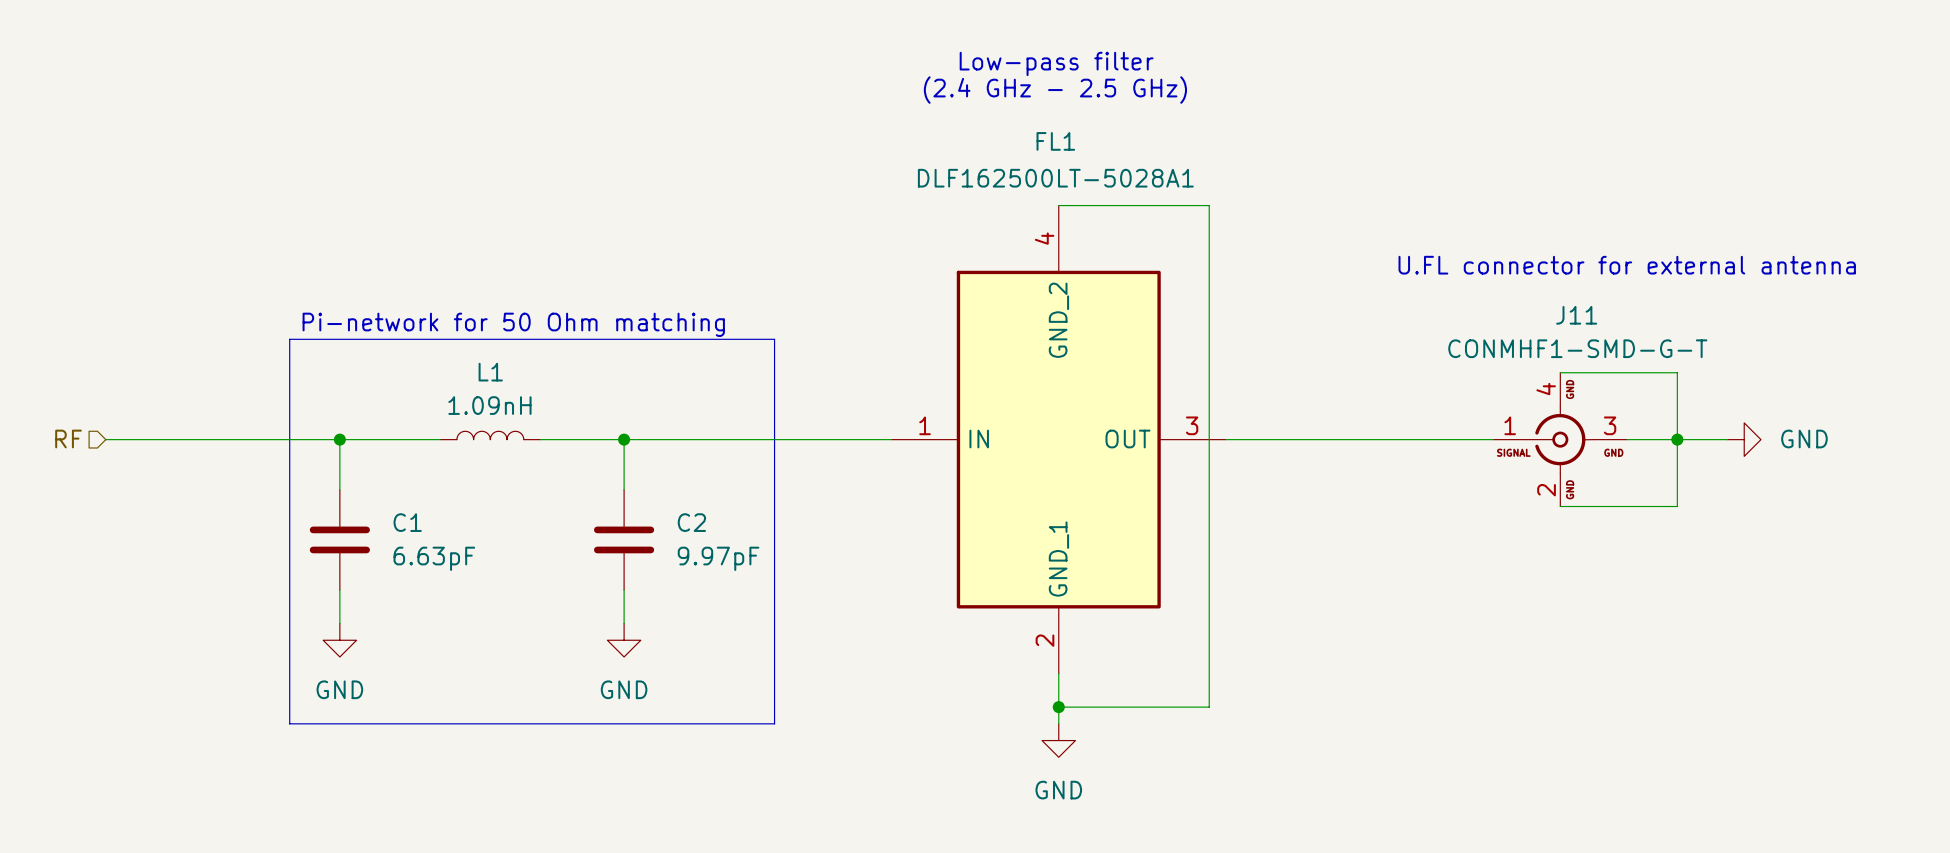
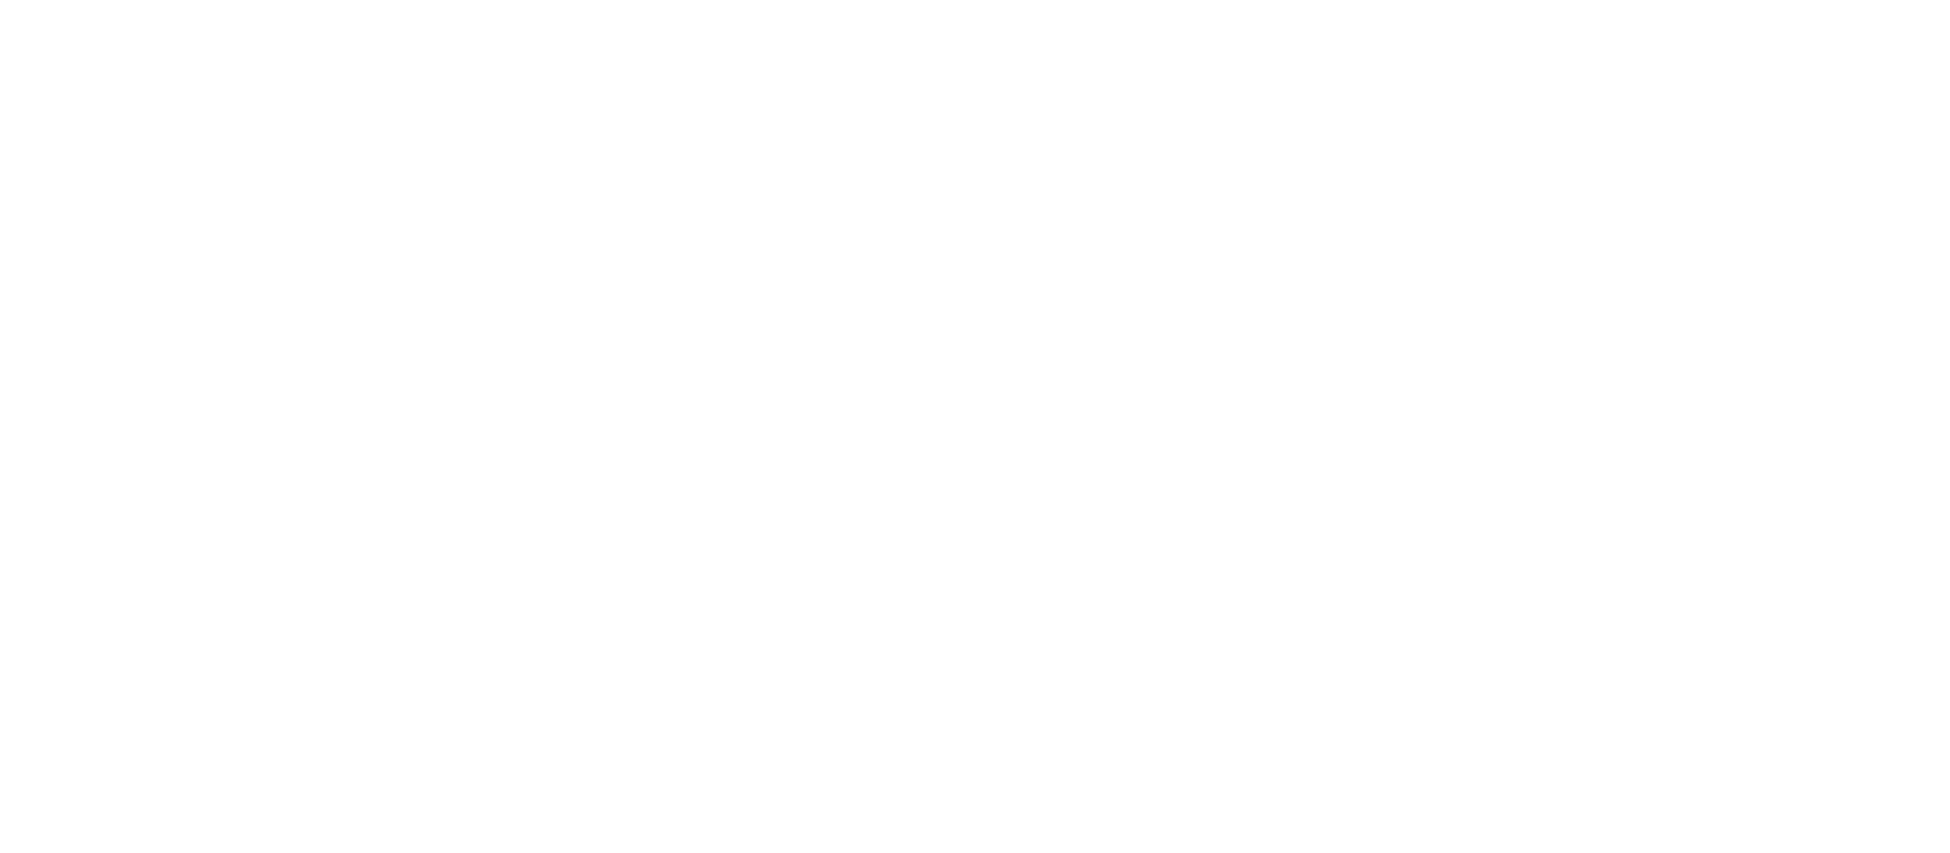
text: Low-pass filter (1056, 63) -> none
text: (2.4 GHz - 2.5 GHz) (1055, 90) -> none
wire: (1058, 205) (1209, 205) (1209, 707) (1058, 707) -> none
text: U.FL connector for external antenna (1627, 265) -> none
text: Pi-network for 50 Ohm matching (513, 324) -> none
line: (289, 339) (774, 339) (774, 723) (289, 723) (289, 339) -> none
wire: (1560, 372) (1677, 372) (1677, 506) (1560, 506) -> none
L1: 1.09nH (490, 435) -> none
hierarchical label: RF (68, 439) -> none
wire: (105, 439) (440, 439) -> none
wire: (339, 439) (339, 489) -> none
junction: (339, 439) -> none
wire: (540, 439) (891, 439) -> none
wire: (624, 439) (624, 489) -> none
junction: (624, 439) -> none
FL1: DLF162500LT-5028A1 (1058, 439) -> none
wire: (1225, 439) (1493, 439) -> none
J11: CONMHF1-SMD-G-T (1560, 439) -> none
wire: (1627, 439) (1727, 439) -> none
junction: (1677, 439) -> none
power symbol: GND (1744, 439) -> none
C1: 6.63pF (339, 539) -> none
C2: 9.97pF (624, 539) -> none
wire: (339, 590) (339, 623) -> none
wire: (624, 590) (624, 623) -> none
power symbol: GND (339, 640) -> none
power symbol: GND (624, 640) -> none
wire: (1058, 673) (1058, 723) -> none
junction: (1058, 707) -> none
power symbol: GND (1058, 740) -> none

